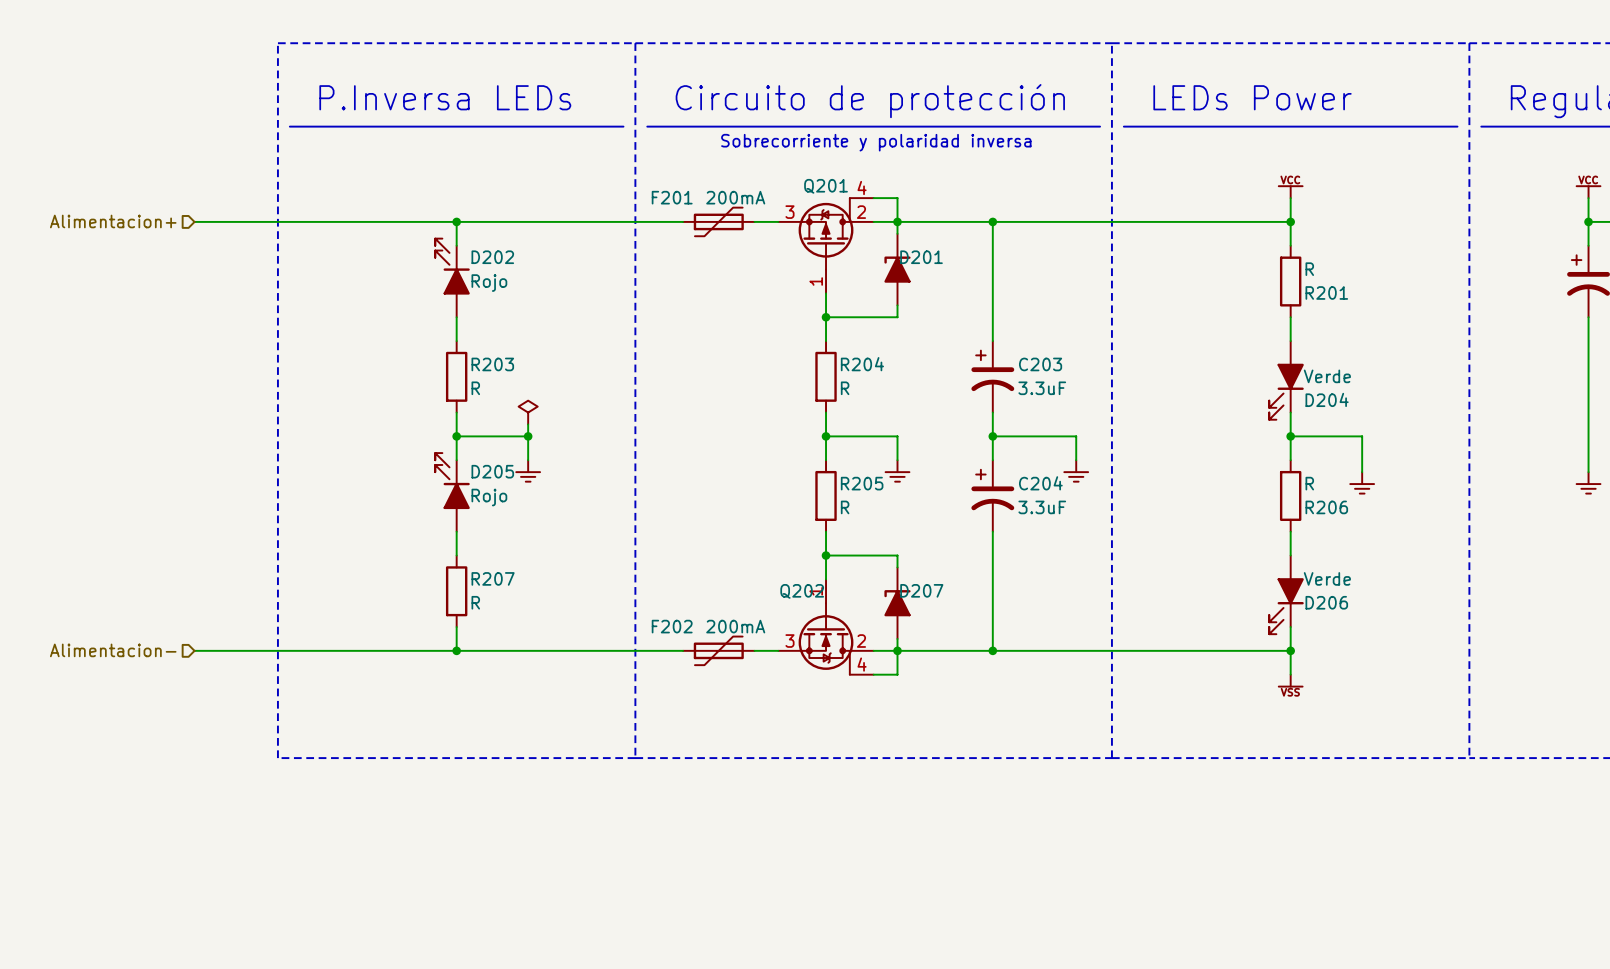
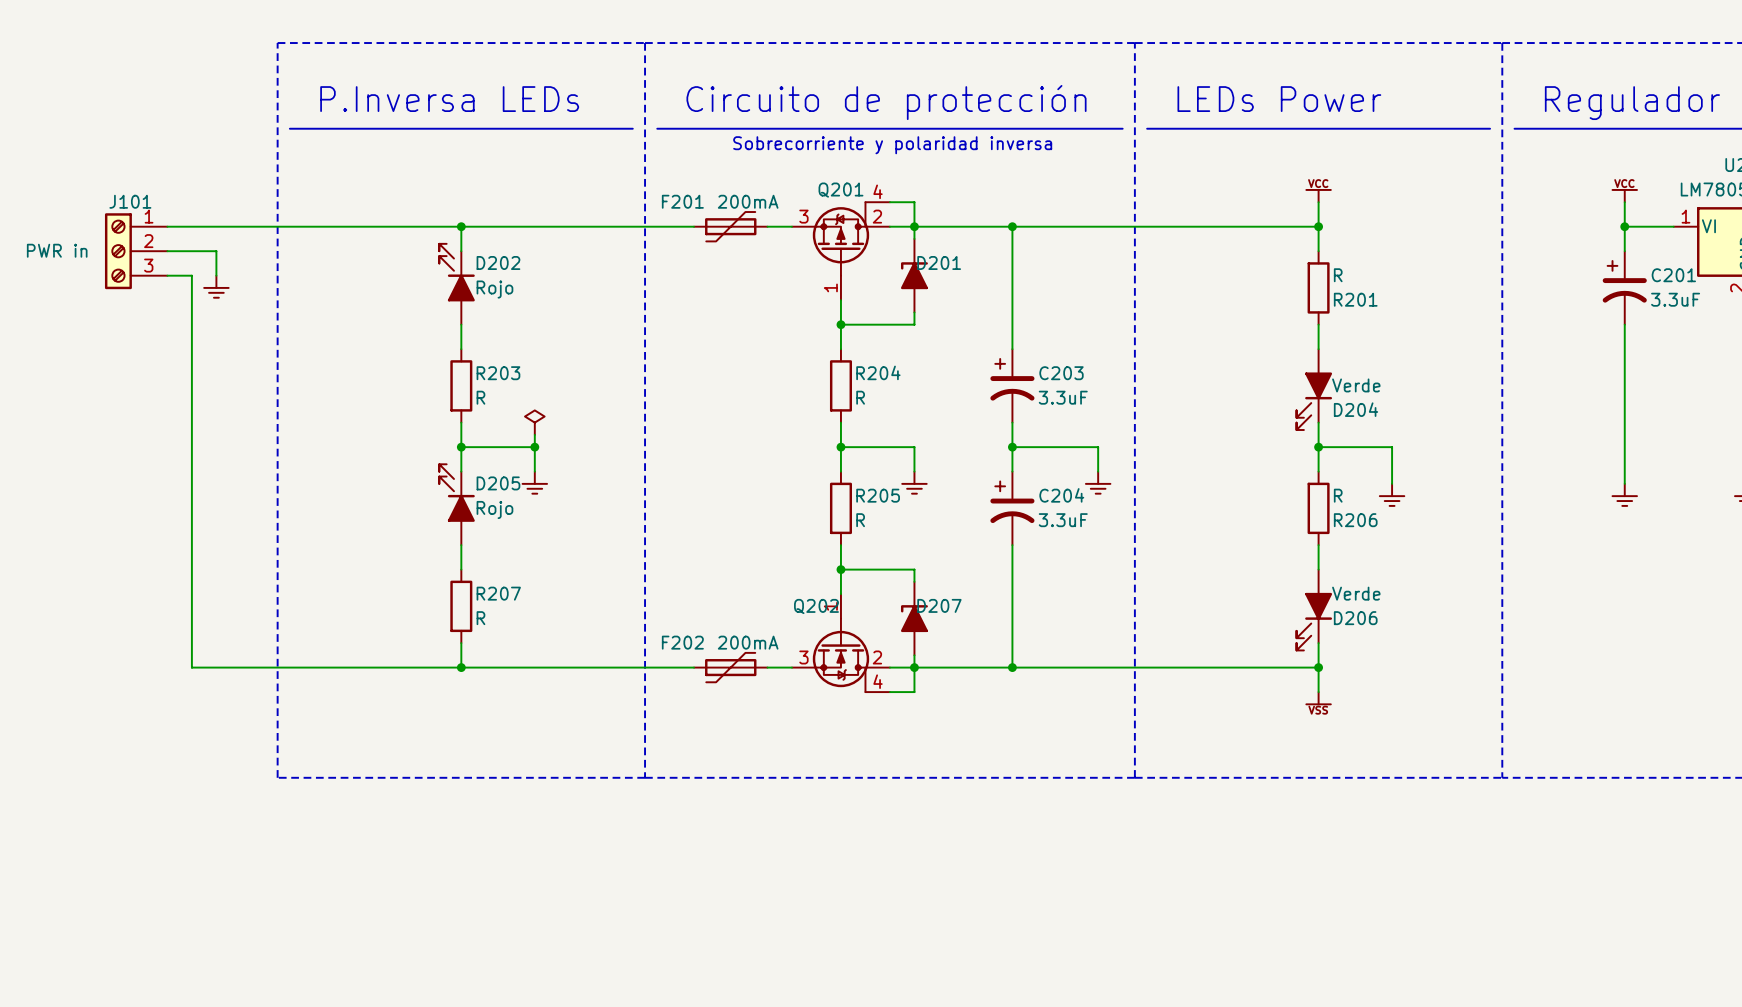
hierarchical label: Alimentacion+ (113, 221) -> none
wire: none -> (167, 226) (191, 226)
J101: none -> (136, 251)
wire: none -> (167, 251) (216, 251) (216, 275)
wire: none -> (167, 275) (191, 275) (191, 667)
power symbol: none -> (216, 286)
hierarchical label: Alimentacion- (113, 650) -> none

